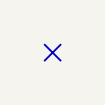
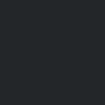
no-connect mark: (52, 52) -> none

